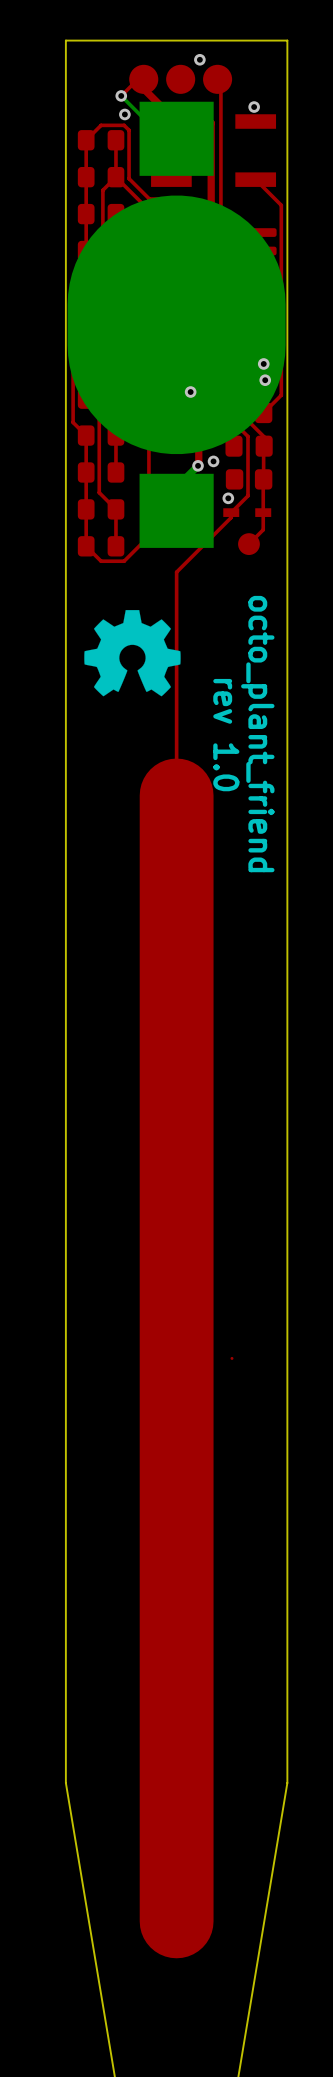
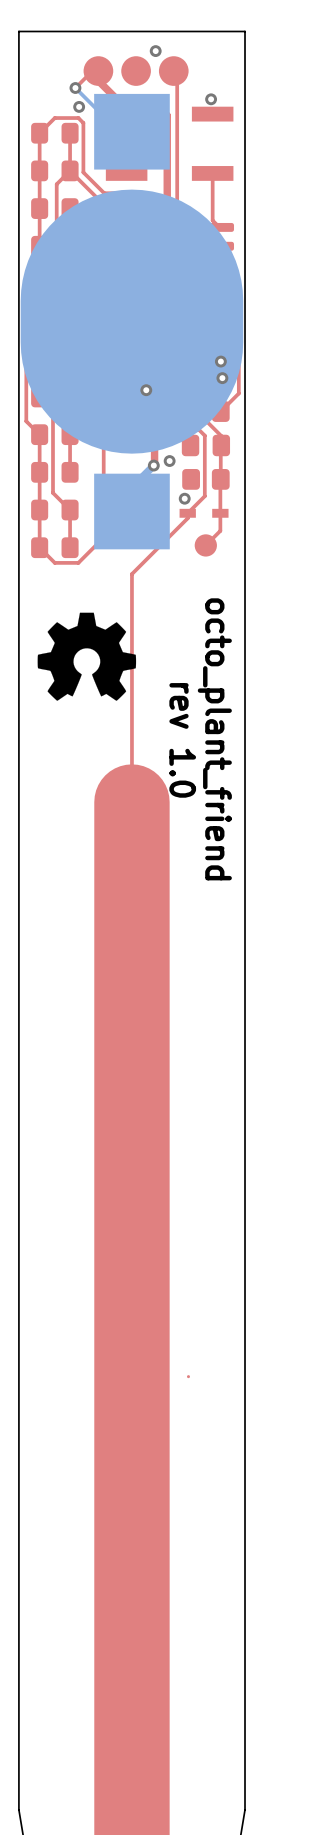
top track: (255, 179) (281, 205) (281, 292) (267, 306) -> none
top track: none -> (212, 177) (212, 220) (219, 227)

